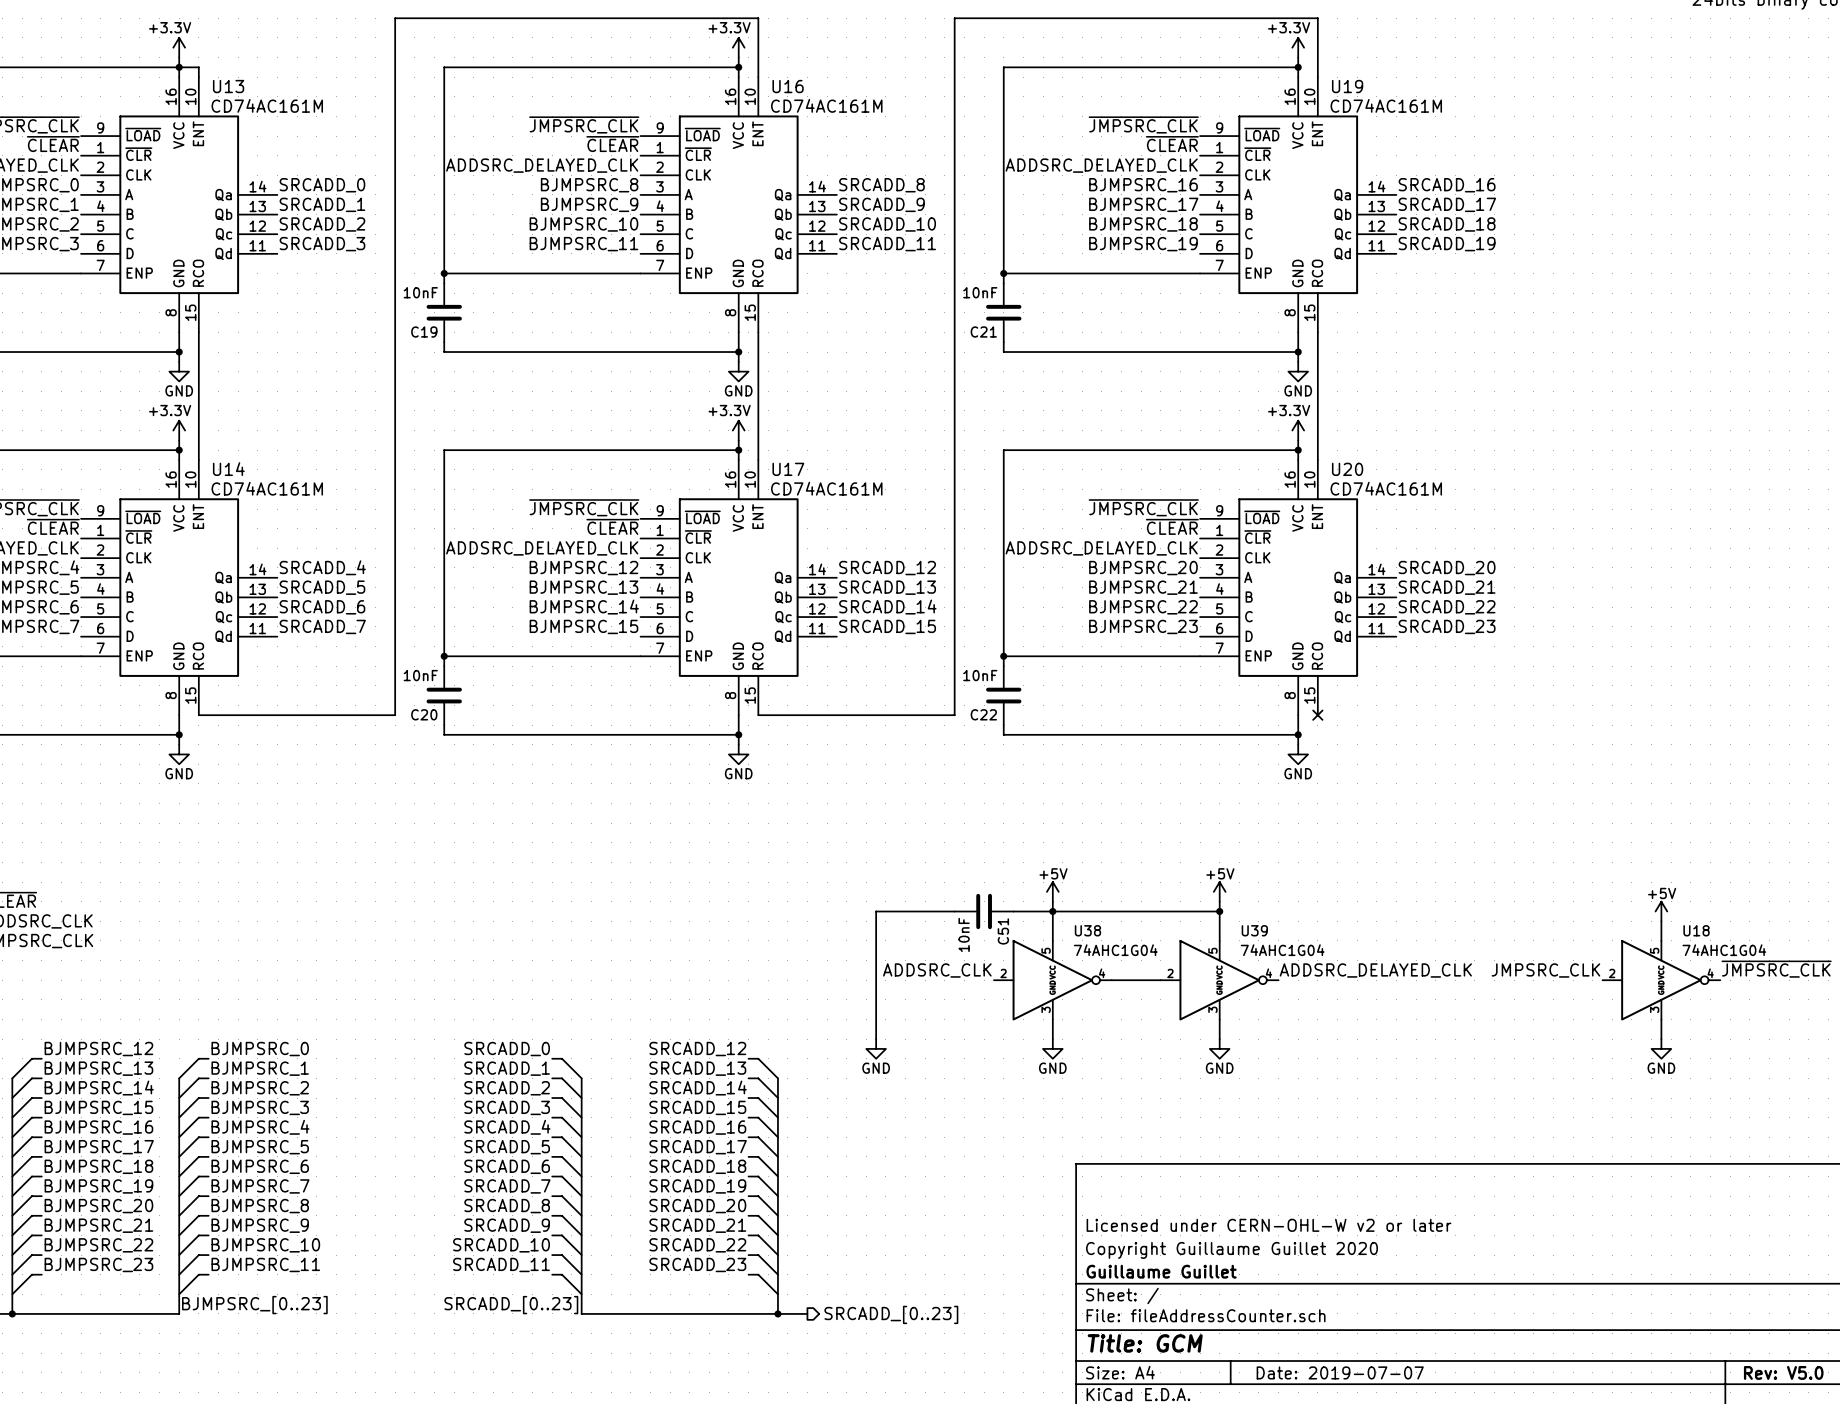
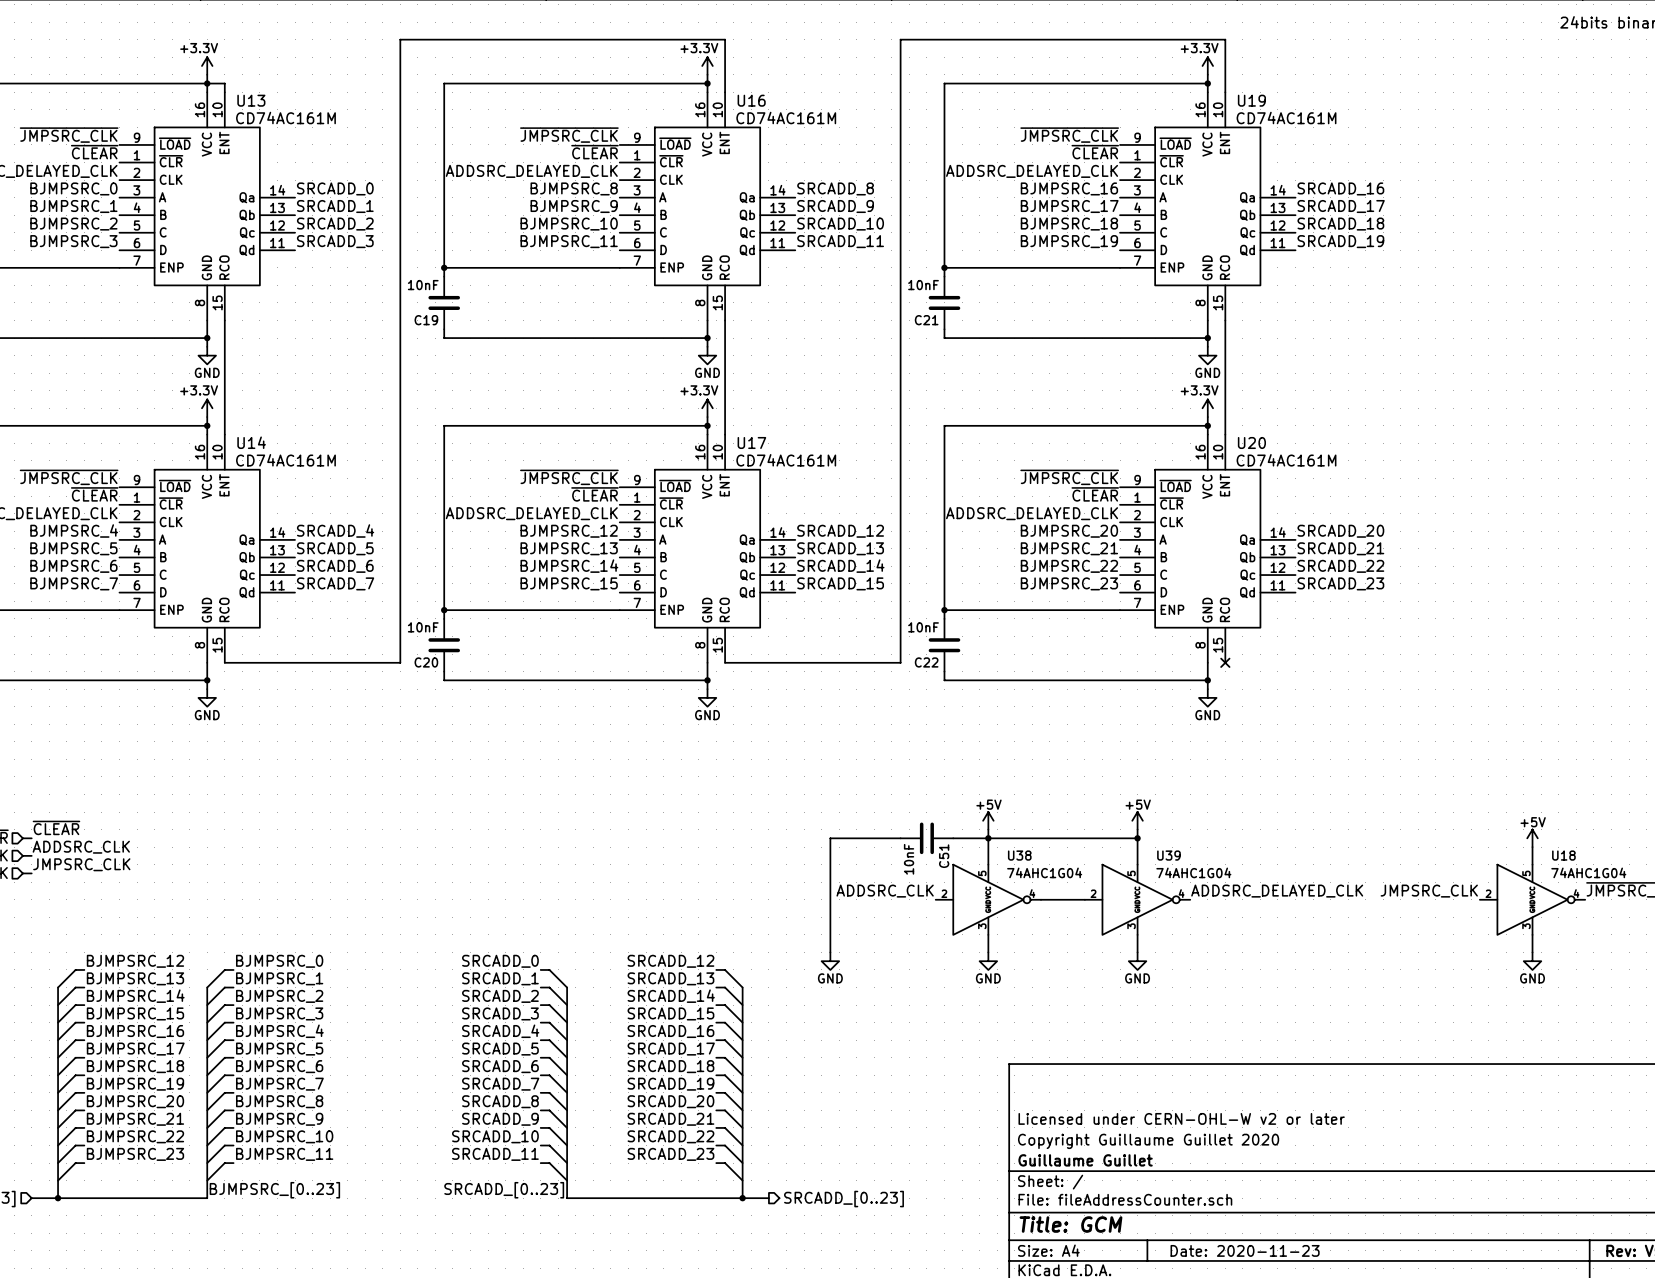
title block: Date: 2019-07-07 (1340, 1372) -> Date: 2020-11-23 (1245, 1250)

